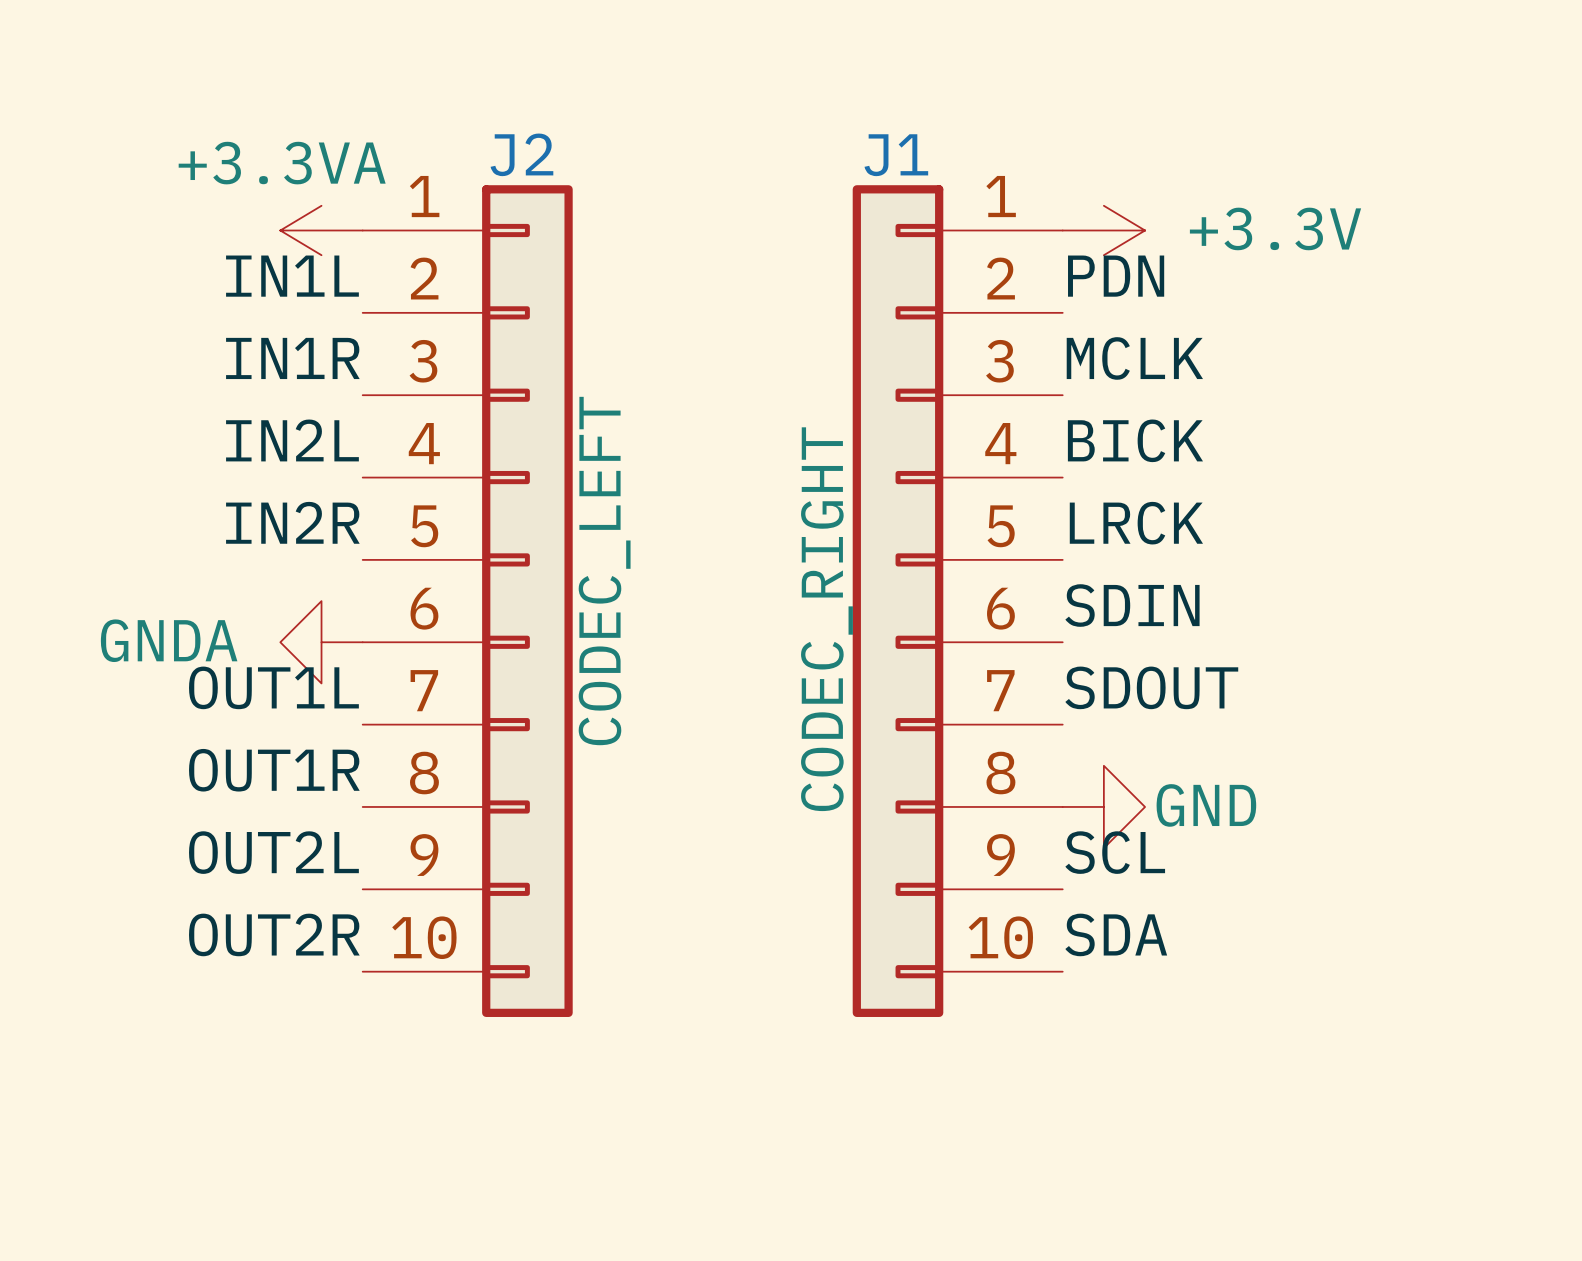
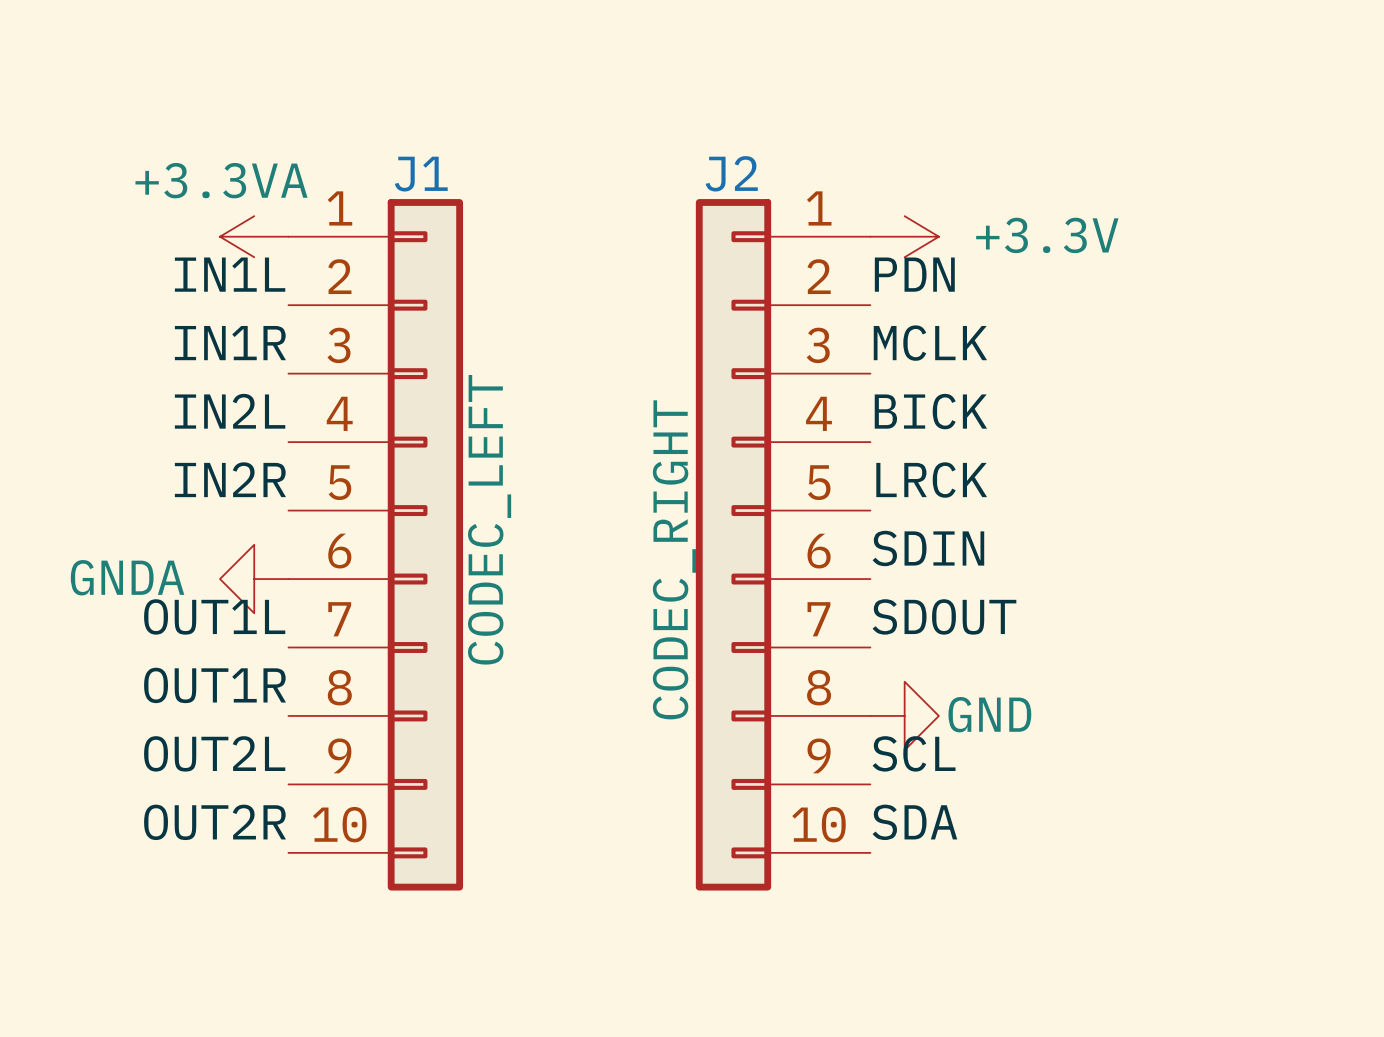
J2 name: J2 (521, 154) -> J1 (421, 174)
J1 name: J1 (896, 155) -> J2 (731, 173)

